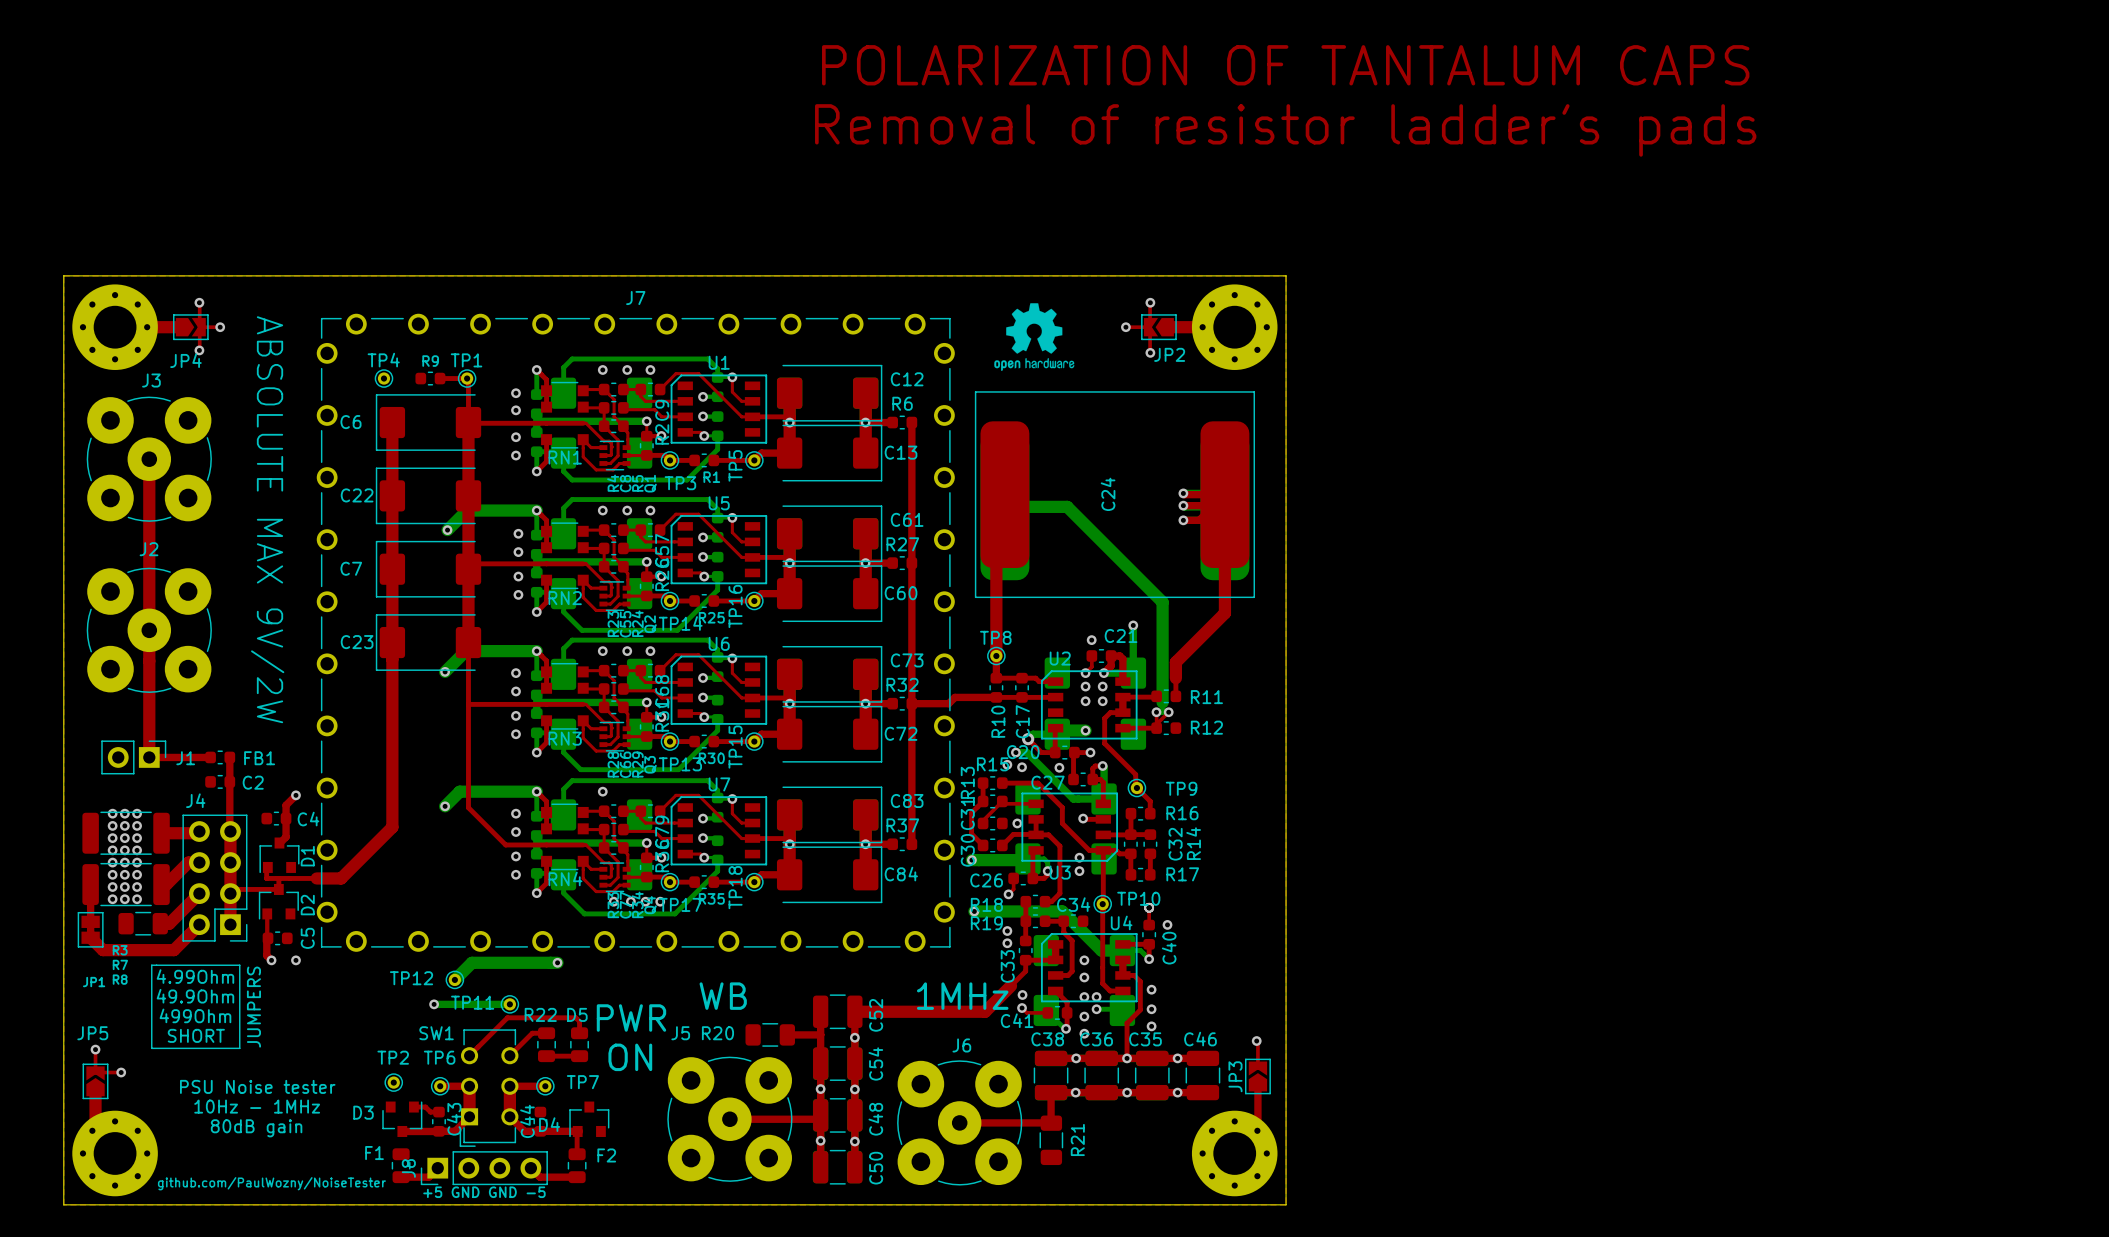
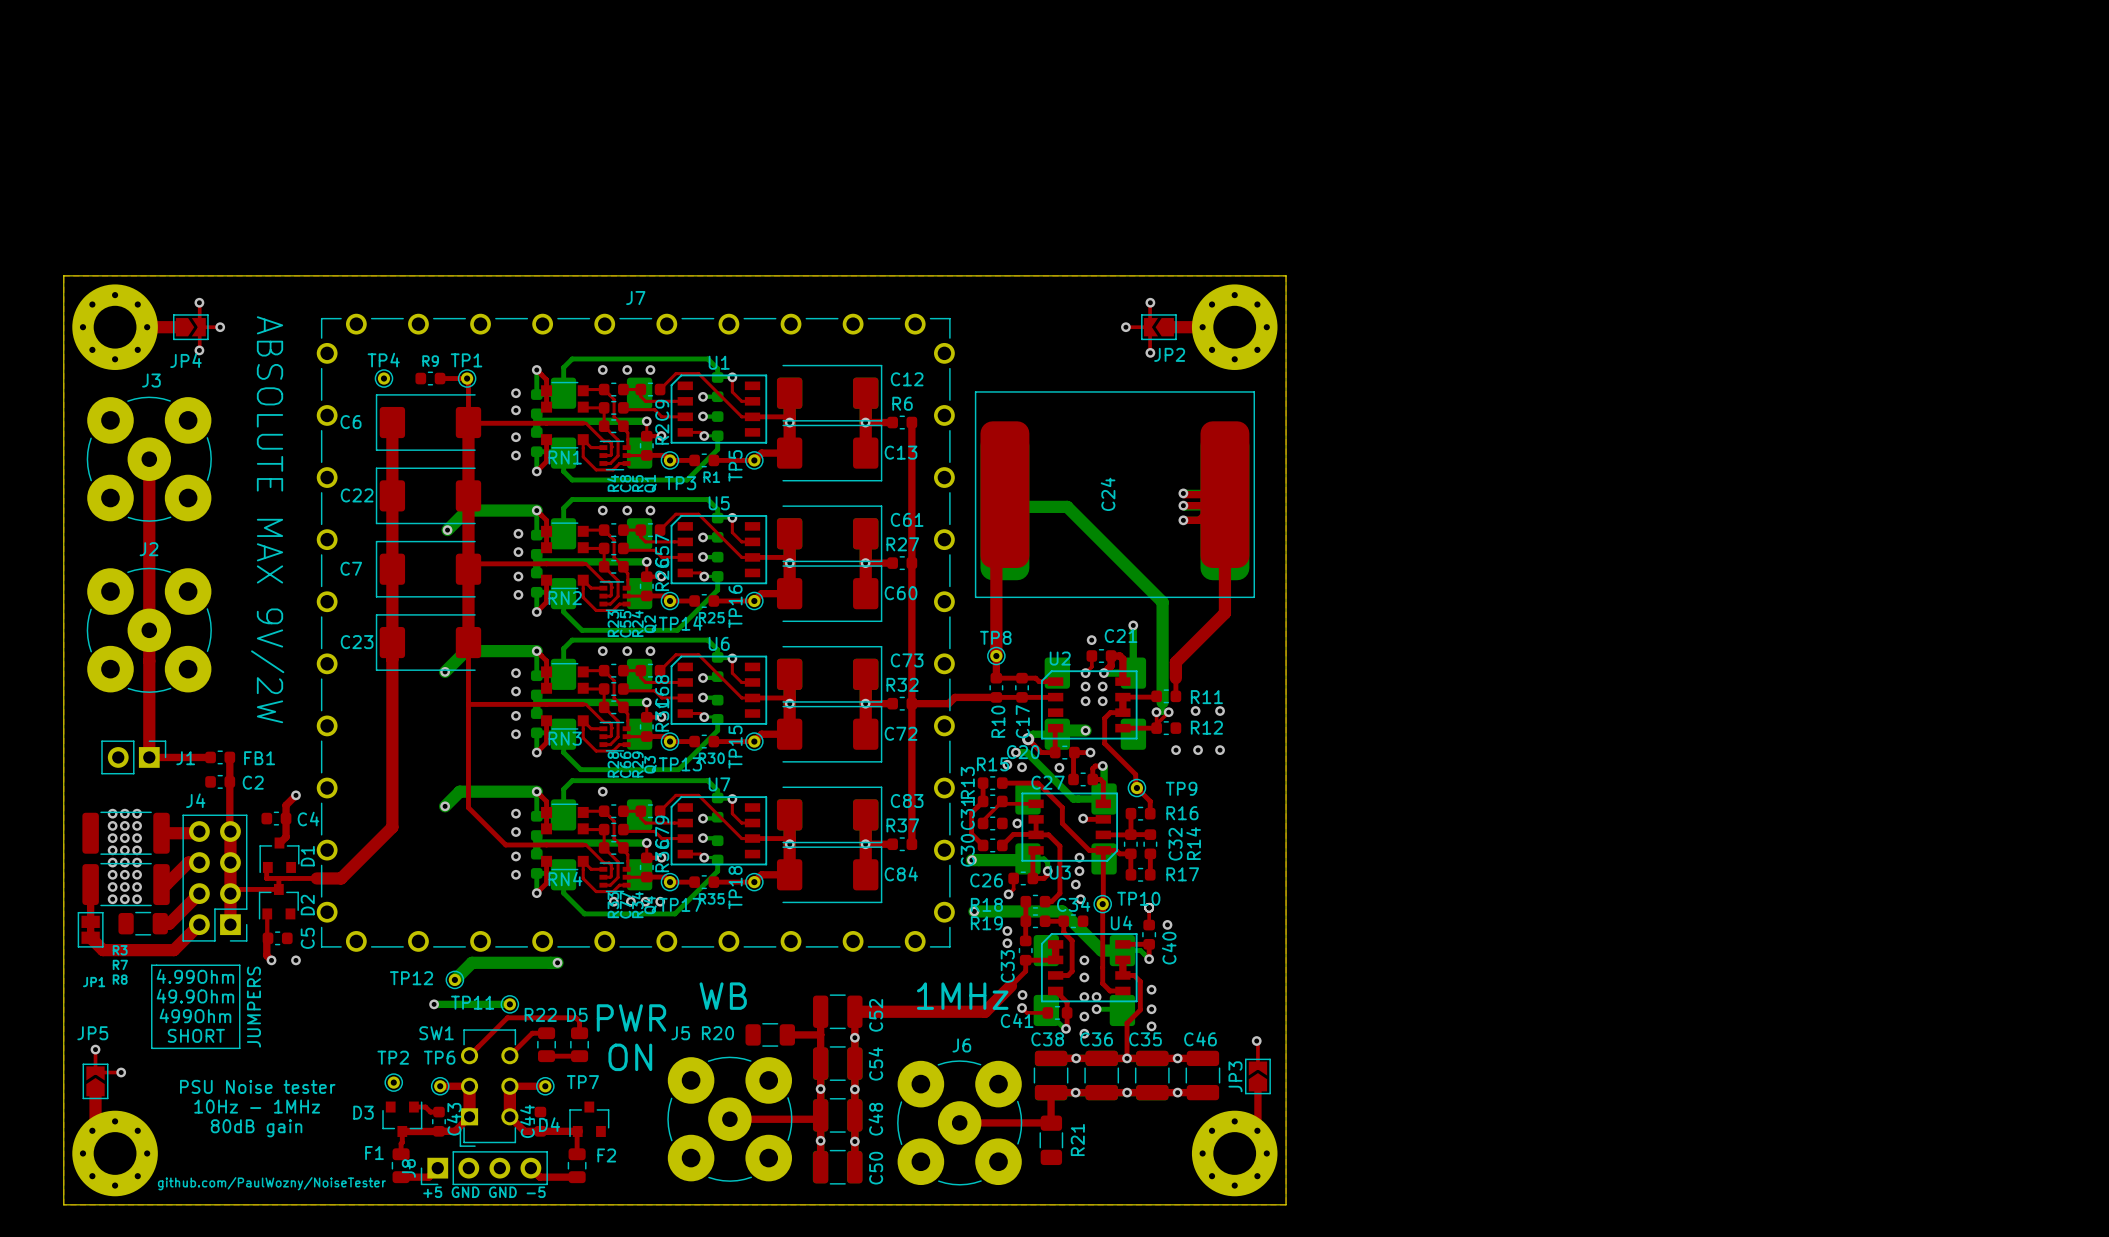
text: POLARIZATION OF TANTALUM CAPS (1285, 65) -> none
text: Removal of resistor ladder's pads (1285, 130) -> none
drawing: [994, 303, 1075, 371] -> none
via: none -> (1195, 711)
via: none -> (1220, 711)
via: none -> (1176, 750)
via: none -> (1198, 750)
via: none -> (1220, 750)
via: none -> (1075, 884)
via: none -> (1080, 899)
top track: none -> (402, 1131) (401, 1154)

